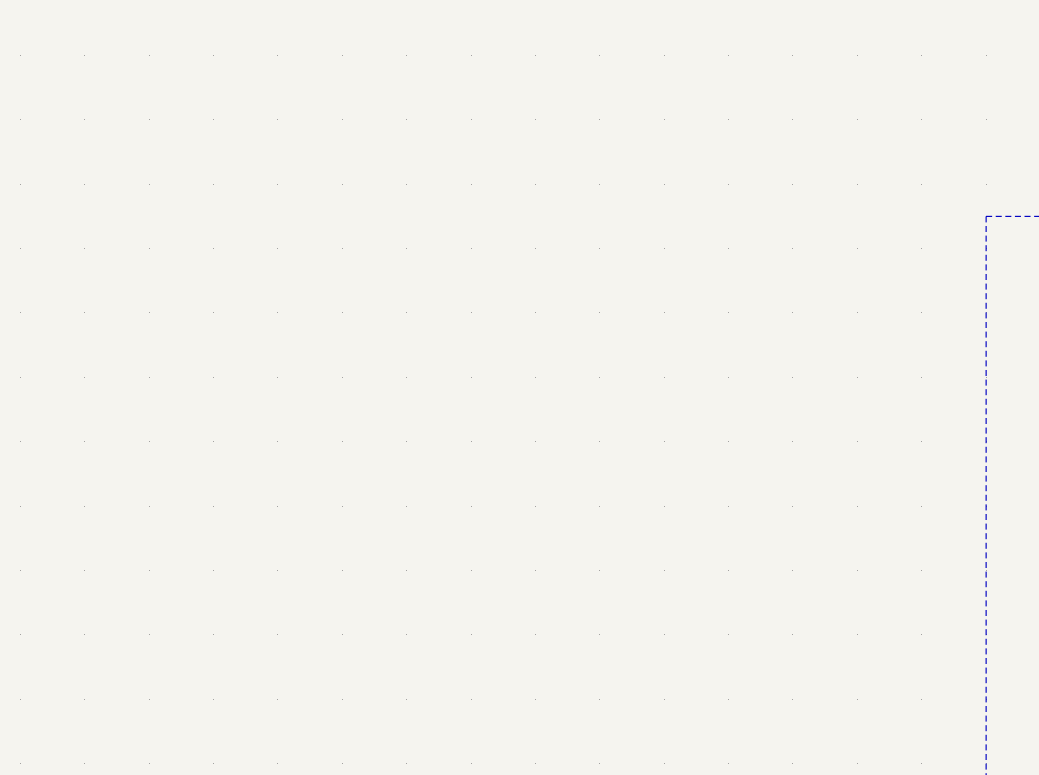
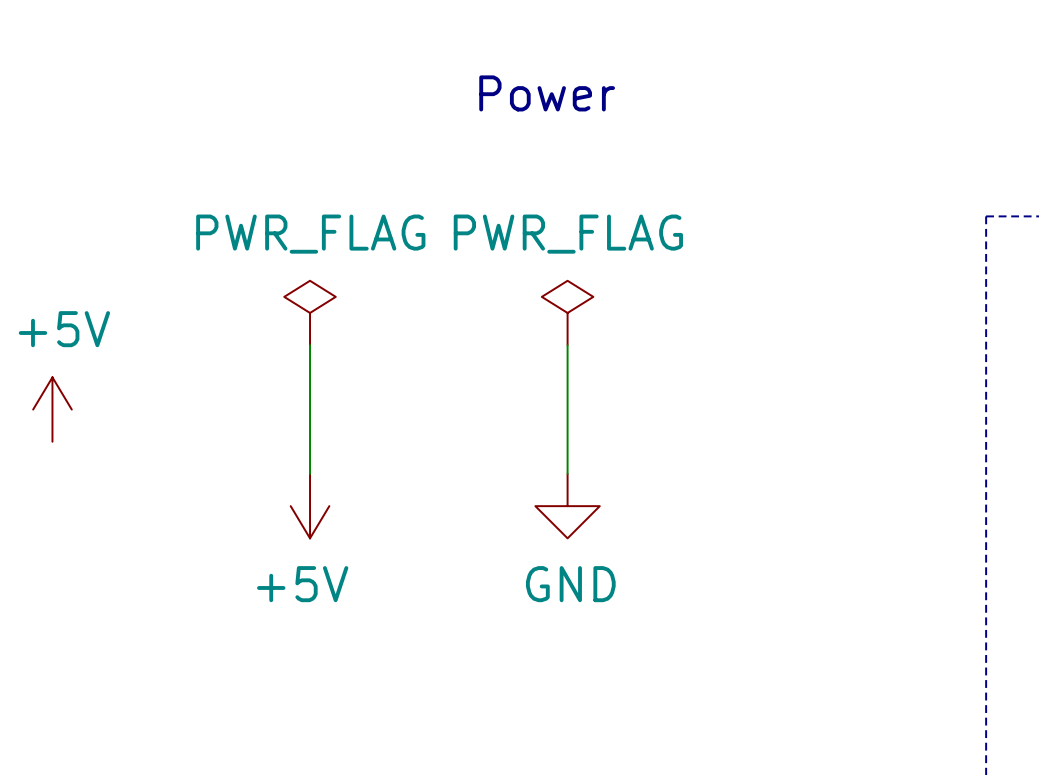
text: none -> Power (547, 93)
power symbol: none -> PWR_FLAG (310, 312)
power symbol: none -> PWR_FLAG (567, 312)
wire: none -> (310, 345) (310, 473)
wire: none -> (567, 345) (567, 473)
power symbol: none -> +5V (52, 409)
power symbol: none -> +5V (310, 506)
power symbol: none -> GND (567, 506)

